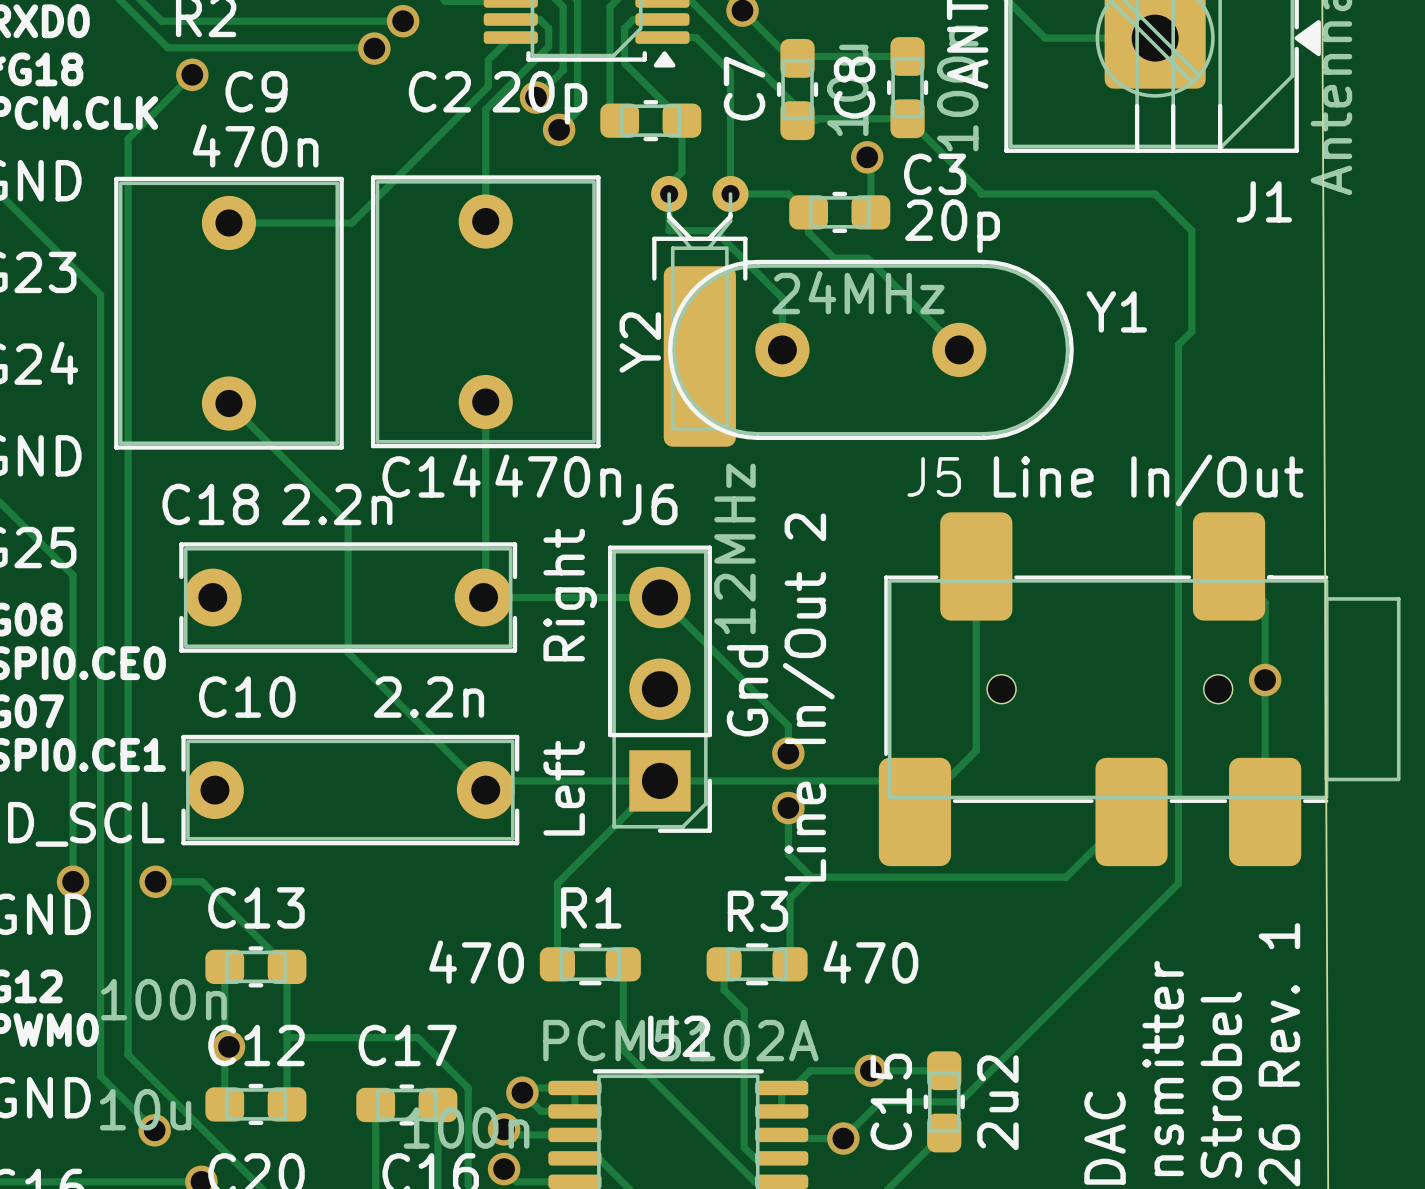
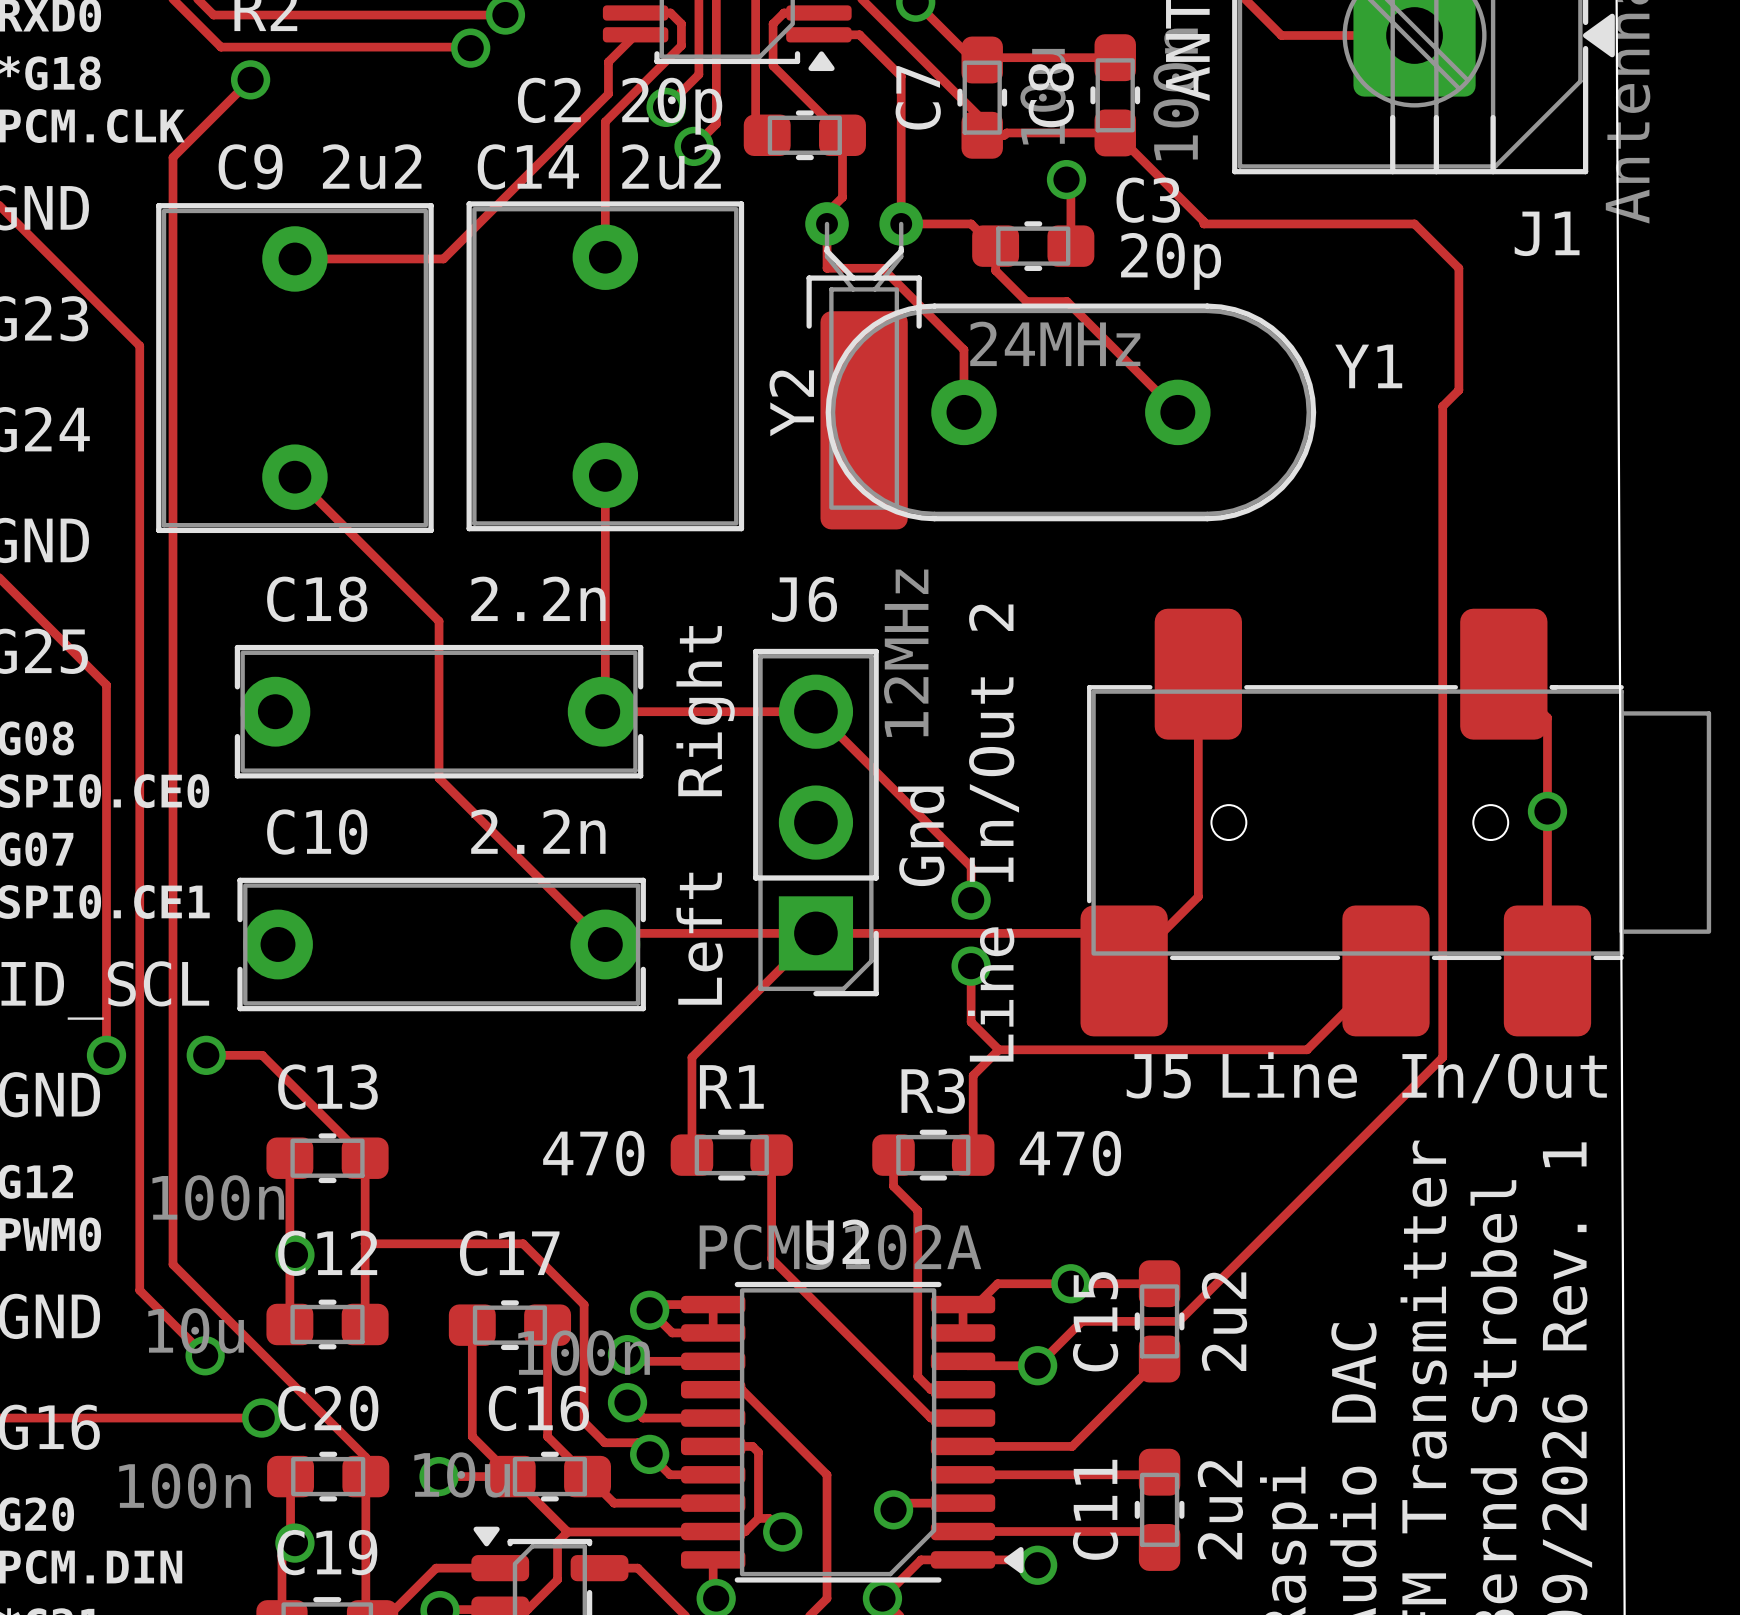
C9 name position: C9 (256, 91) -> C9 (250, 166)
C9 value: 470n (255, 145) -> 2u2 (372, 166)
C14 name position: C14 (431, 476) -> C14 (528, 166)
C14 value: 470n (558, 476) -> 2u2 (671, 166)
J5 name position: J5 (934, 476) -> J5 (1158, 1076)
J5 value position: Line In/Out (1148, 480) -> Line In/Out (1414, 1077)
C18 name position: C18 (210, 504) -> C18 (317, 599)
C18 value position: 2.2n (337, 504) -> 2.2n (538, 598)

